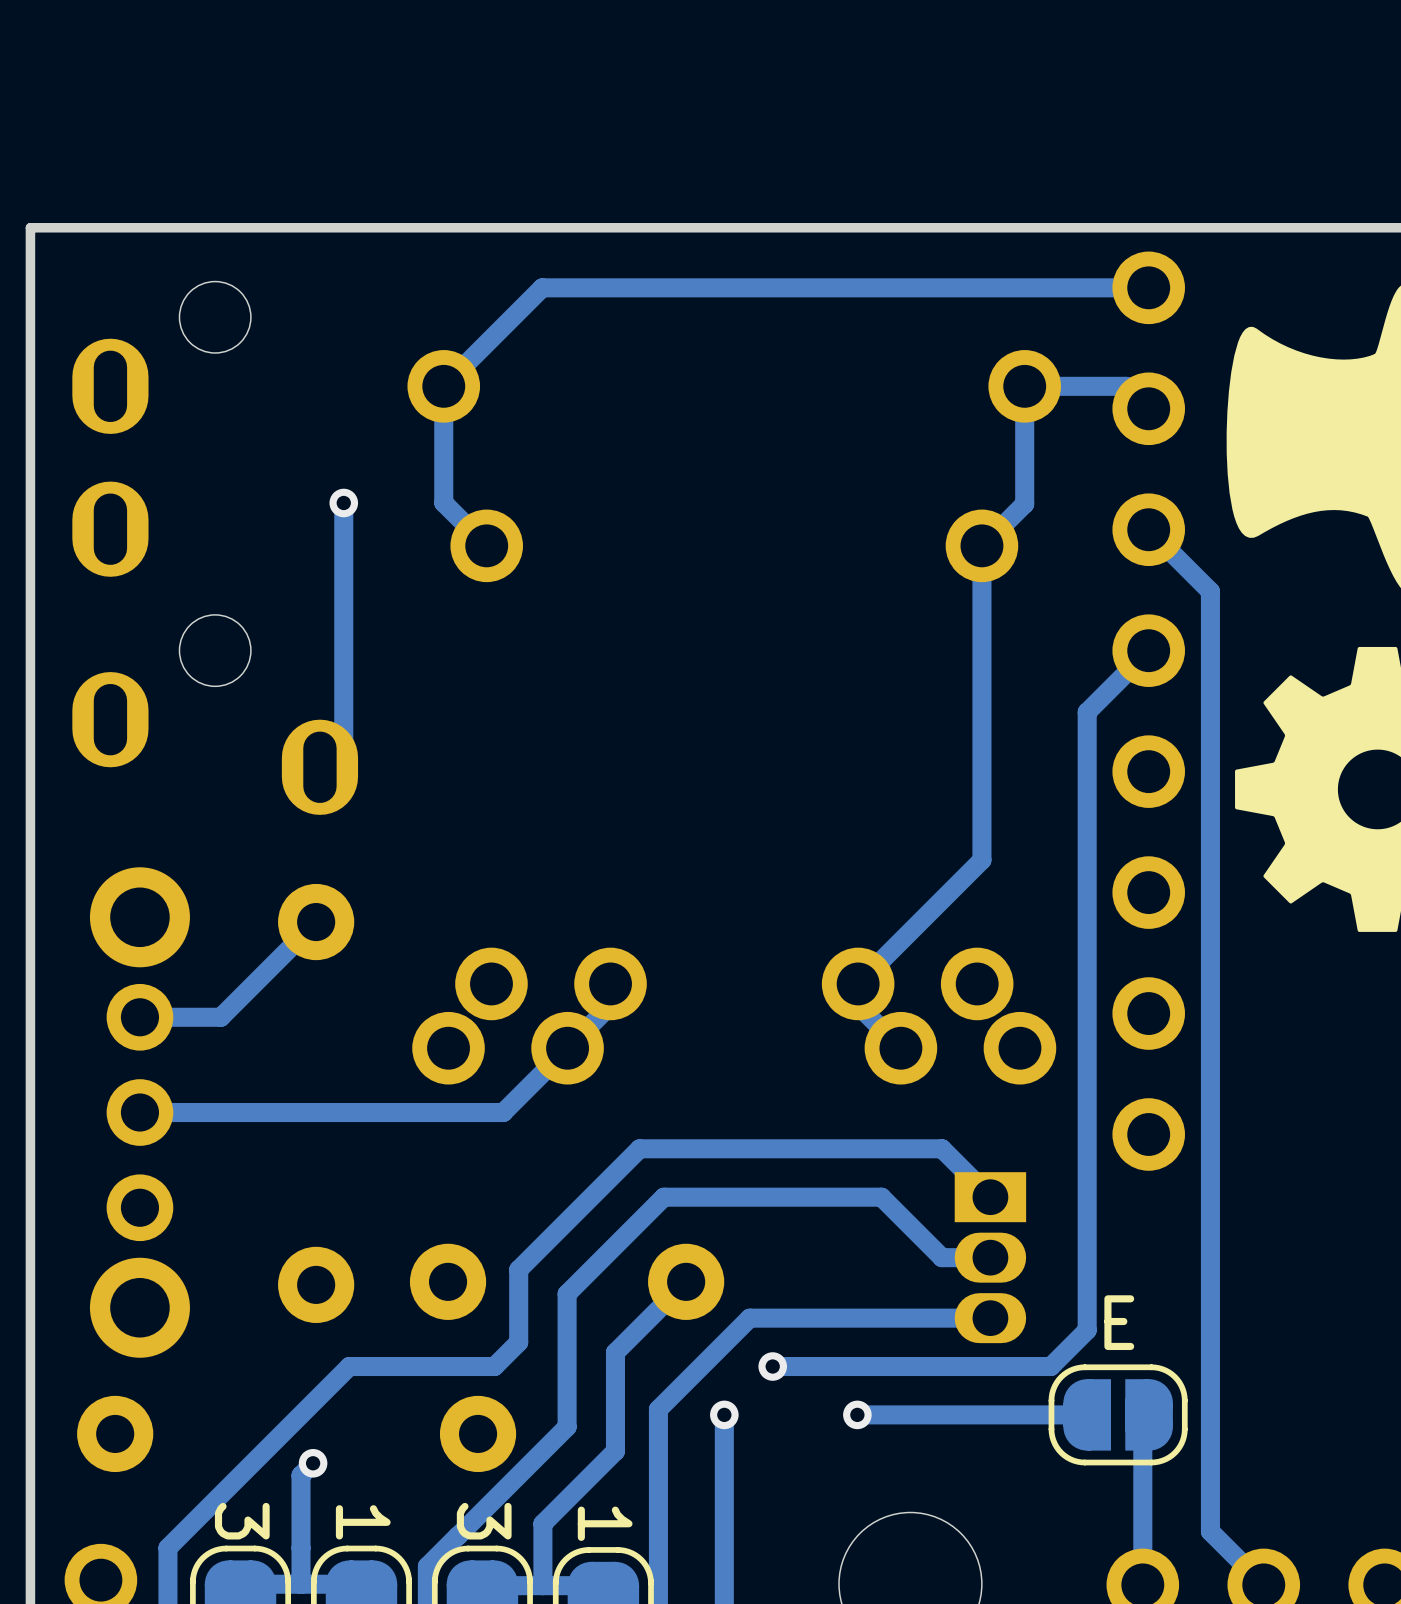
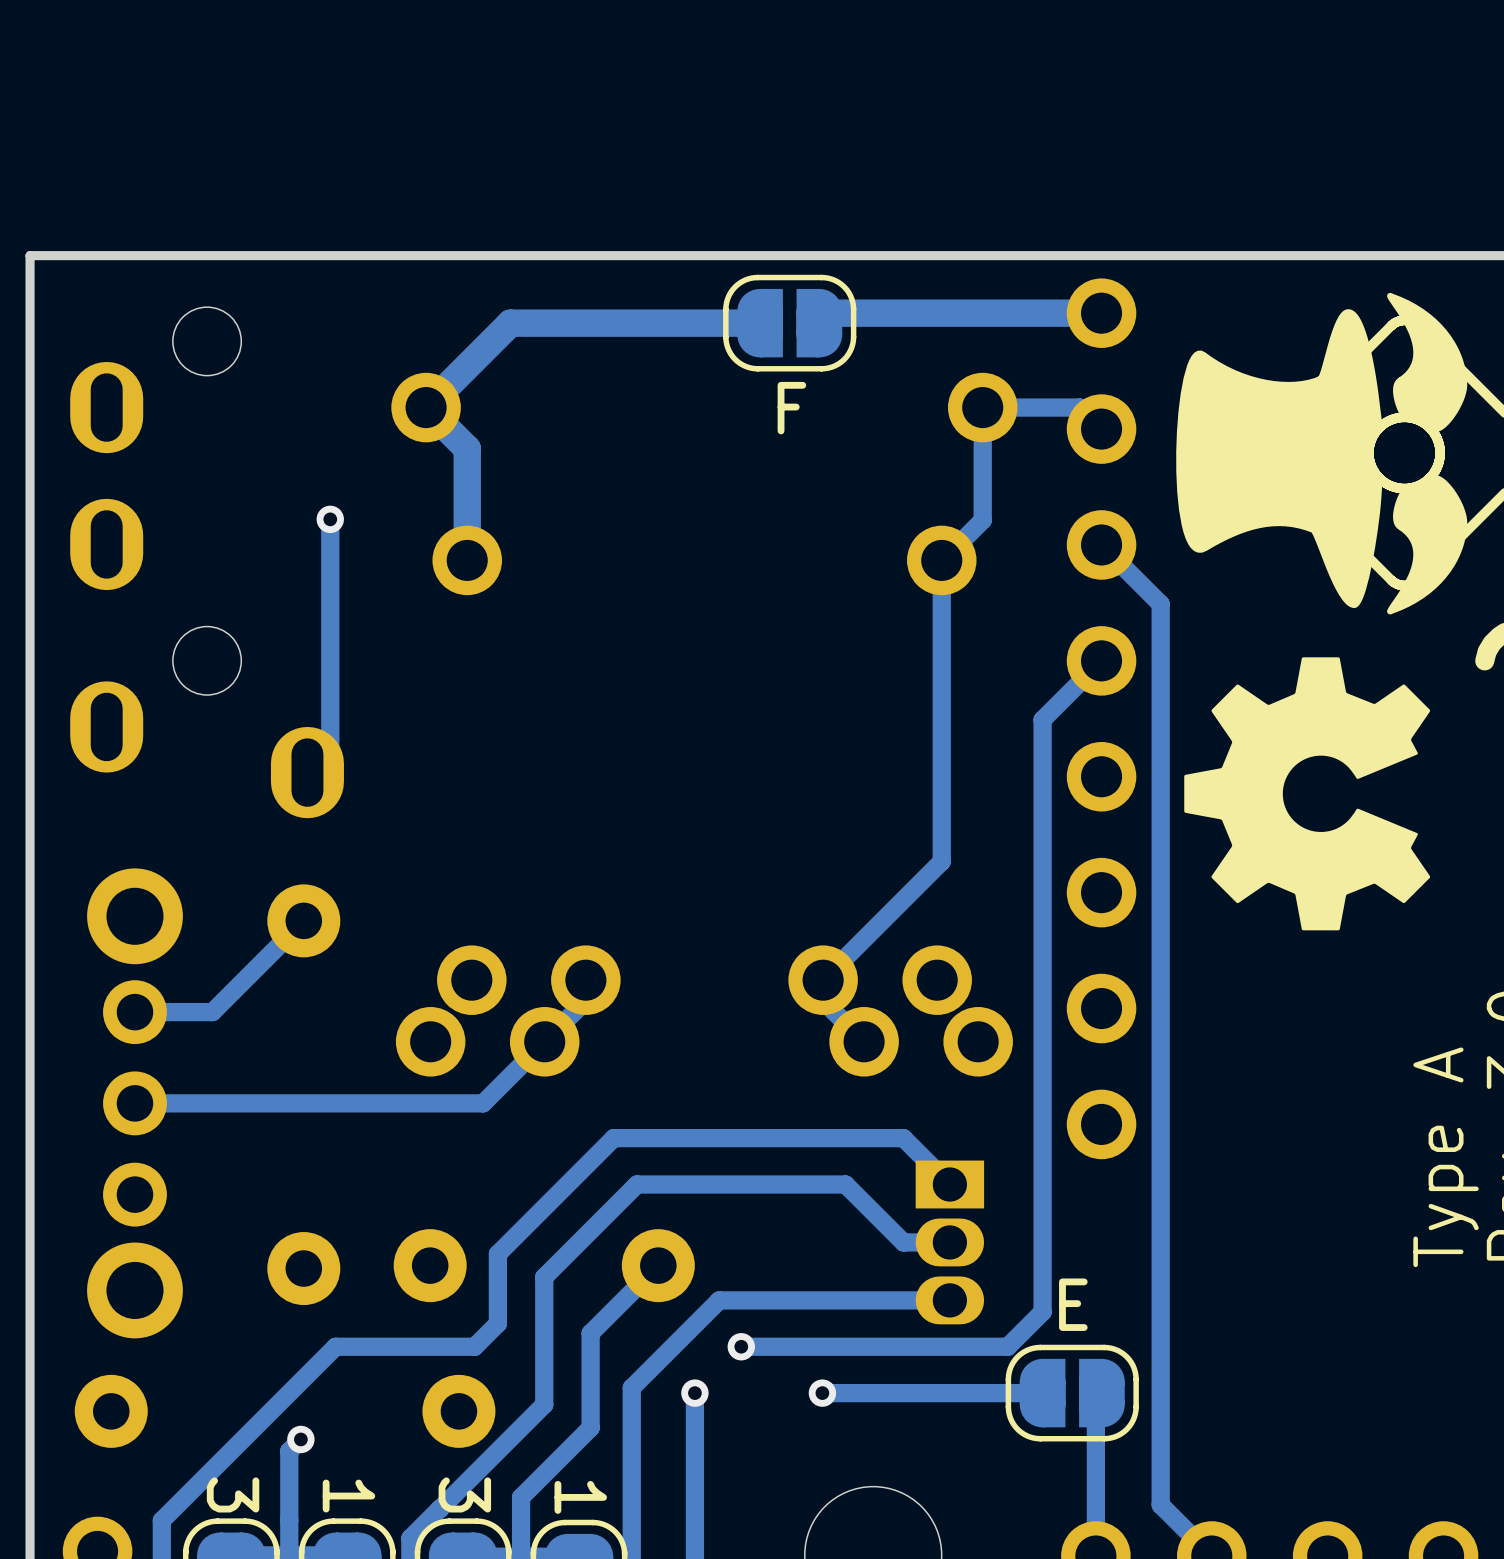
track: (864, 287) (542, 287) (531, 298) -> (760, 323) (510, 323)
track width: thin (1148, 287) (864, 287) -> thick (1101, 313) (829, 313)
track width: thin (531, 298) (443, 386) -> thick (510, 323) (426, 407)
part: none -> F (789, 323)
track: (443, 386) (443, 502) (486, 545) -> (426, 407) (467, 448) (467, 560)

